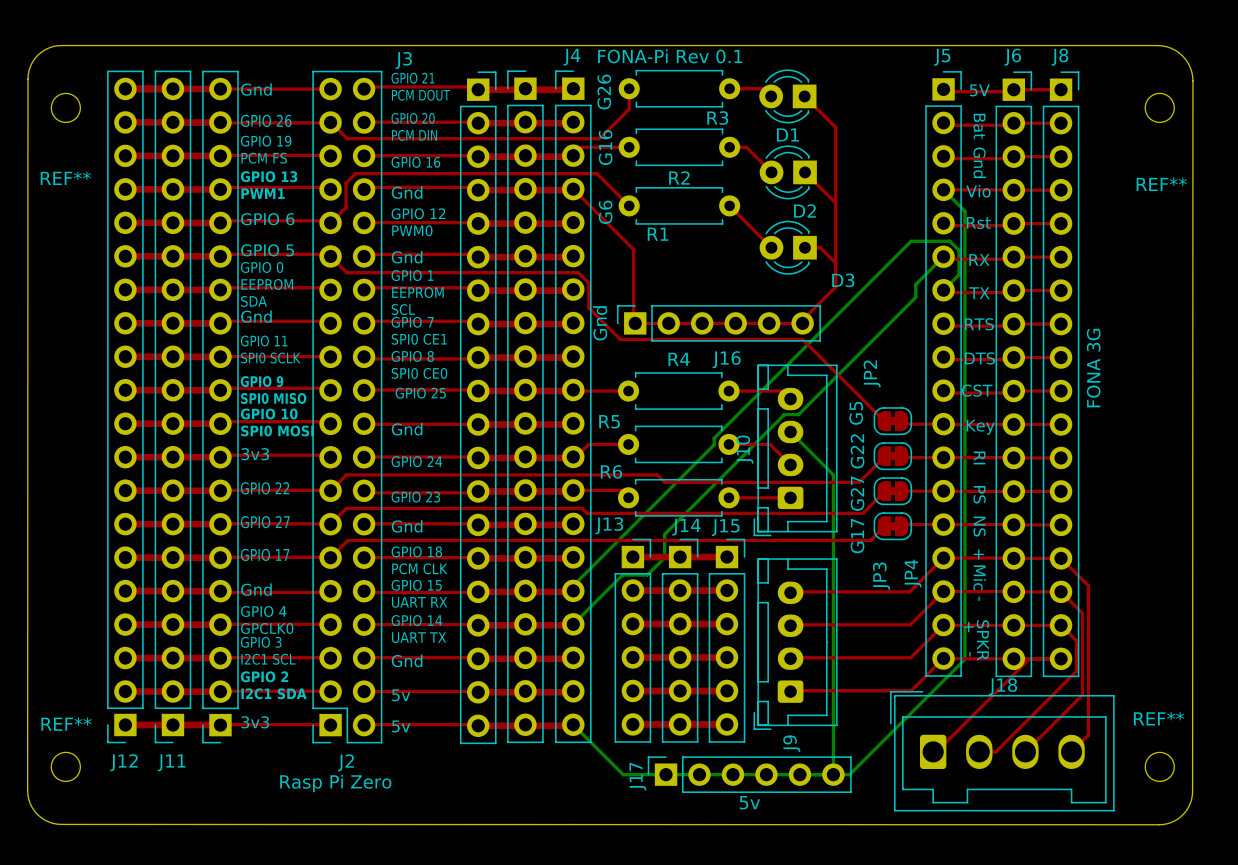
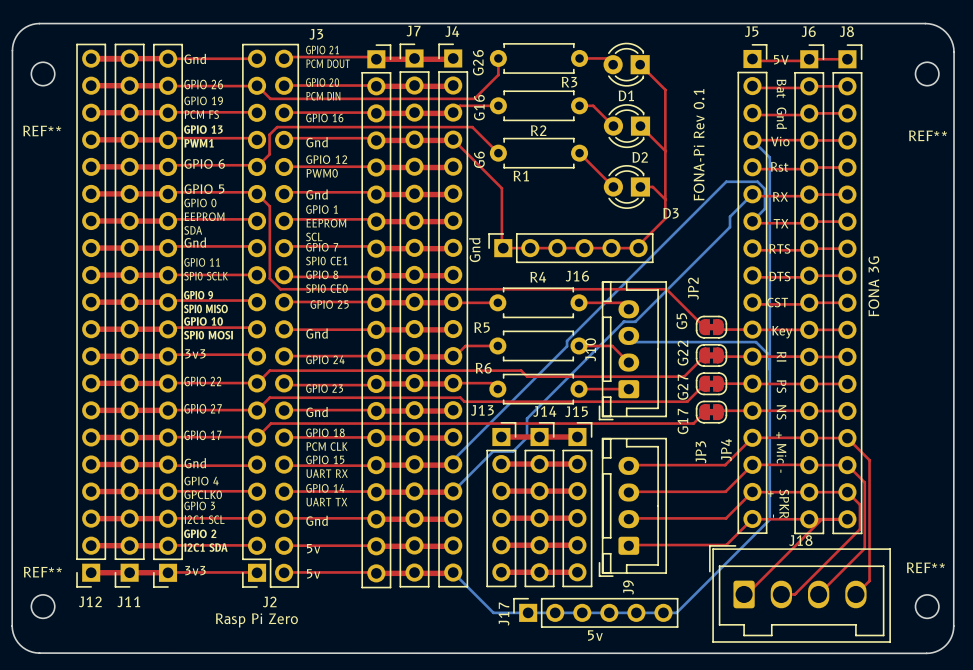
J7 name: none -> J7 (413, 31)
text: FONA-Pi Rev 0.1 (670, 56) -> none
text: none -> FONA-Pi Rev 0.1 (699, 144)
top track: (330, 256) (346, 272) (578, 272) (588, 283) (588, 307) (620, 339) (802, 339) (884, 421) -> (257, 193) (269, 206) (269, 278) (280, 289) (666, 289) (703, 326)
bottom track: (798, 439) (833, 474) (833, 774) -> (634, 342) (756, 342) (769, 355)

